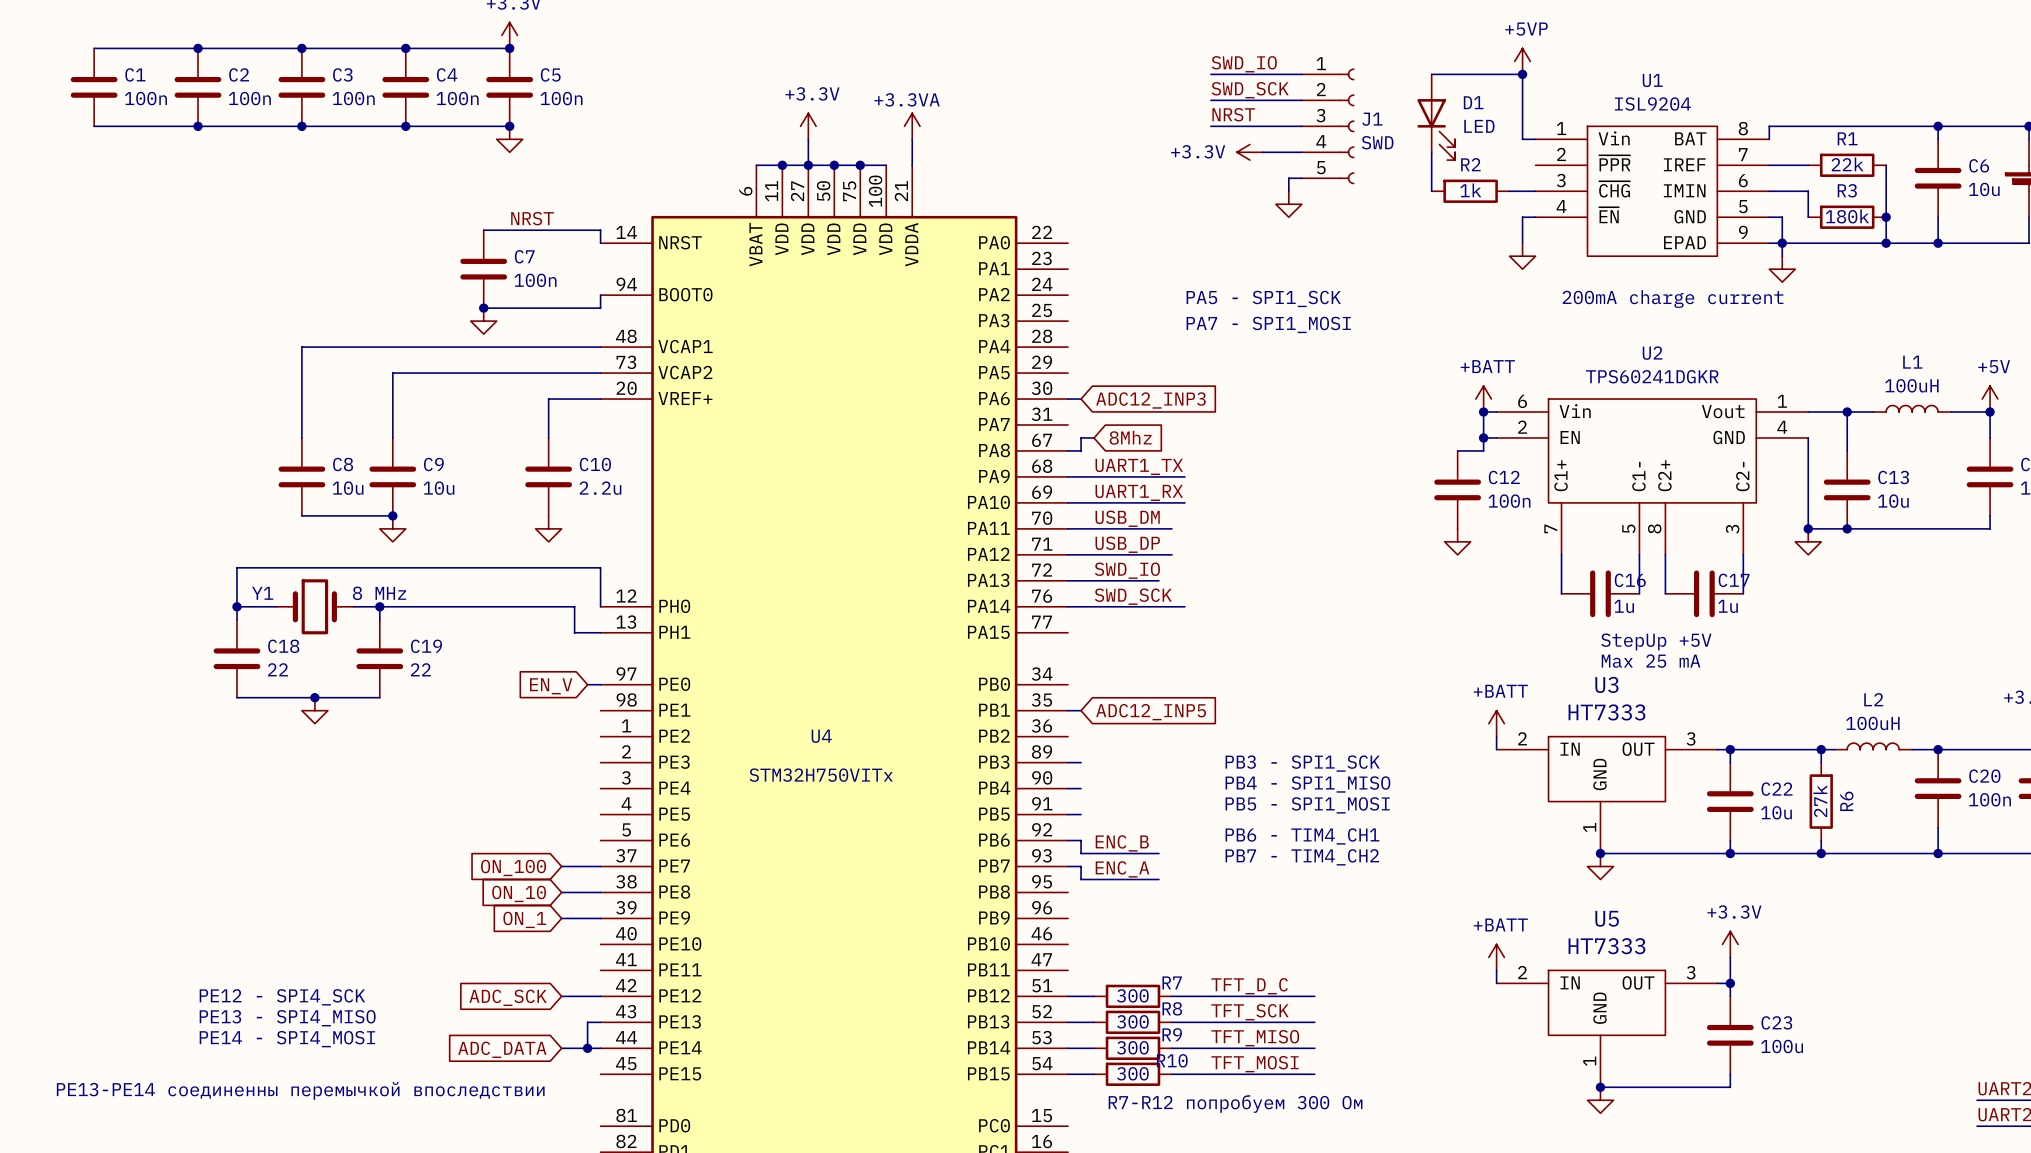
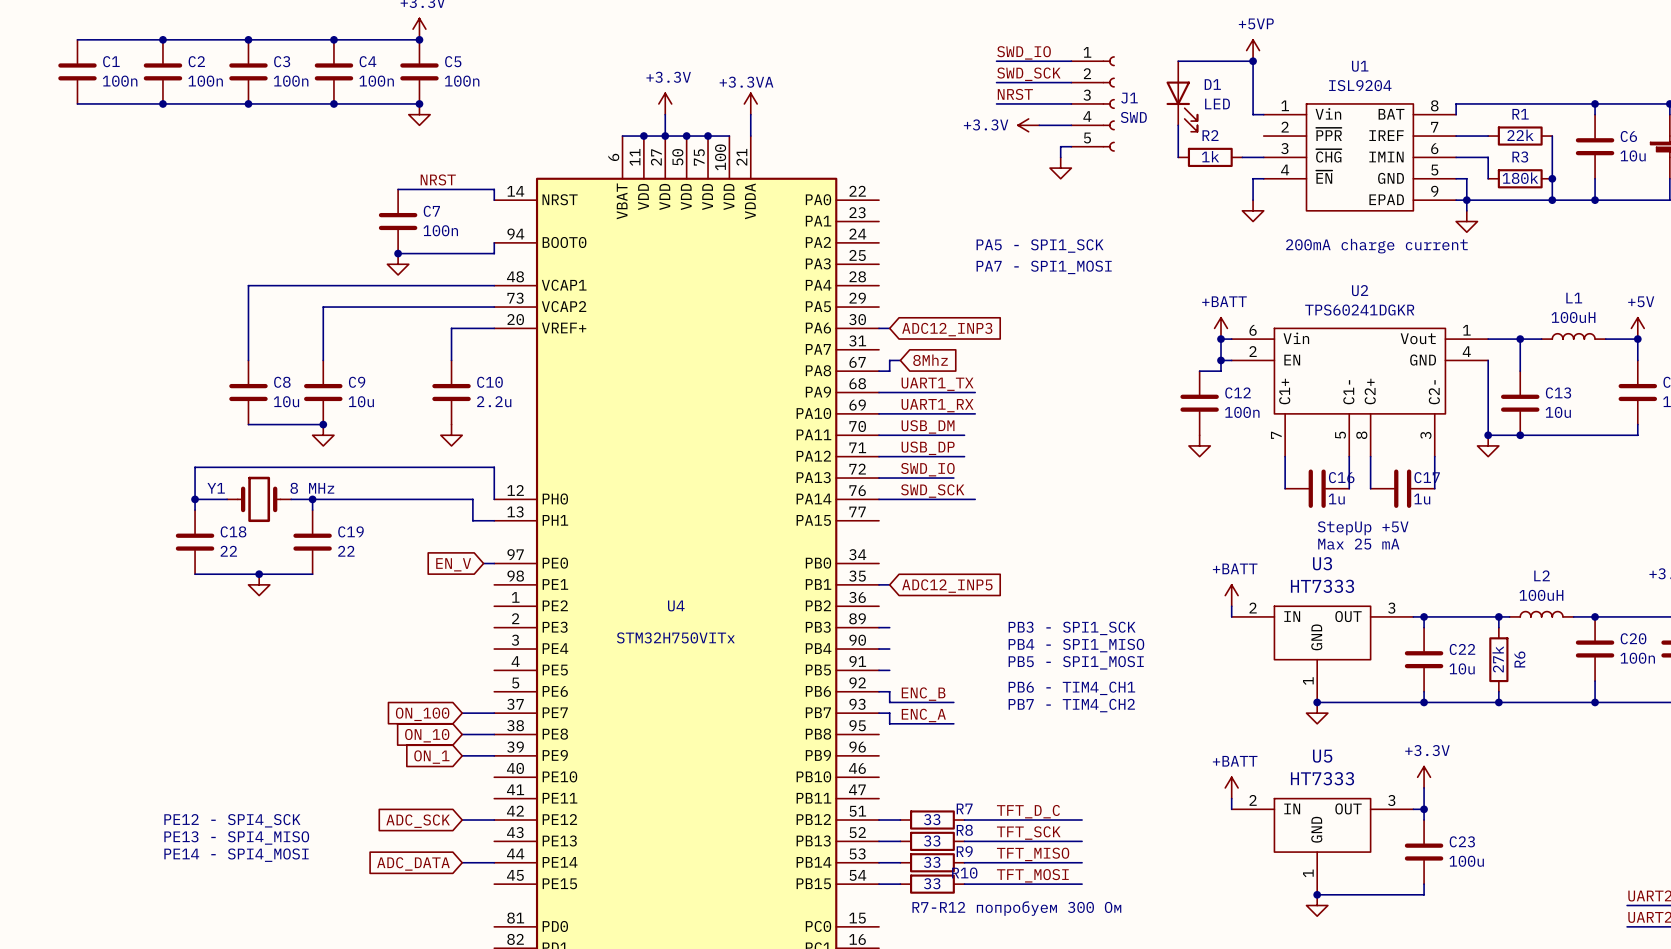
R7 value: 300 (1132, 995) -> 33 (932, 819)
R8 value: 300 (1132, 1021) -> 33 (932, 840)
wire: (600, 1022) (587, 1022) (587, 1048) -> none
R9 value: 300 (1132, 1047) -> 33 (932, 862)
junction: (587, 1048) -> none
R10 value: 300 (1132, 1073) -> 33 (932, 883)
text: PE13-PE14 соединенны перемычкой впоследствии (300, 1090) -> none

